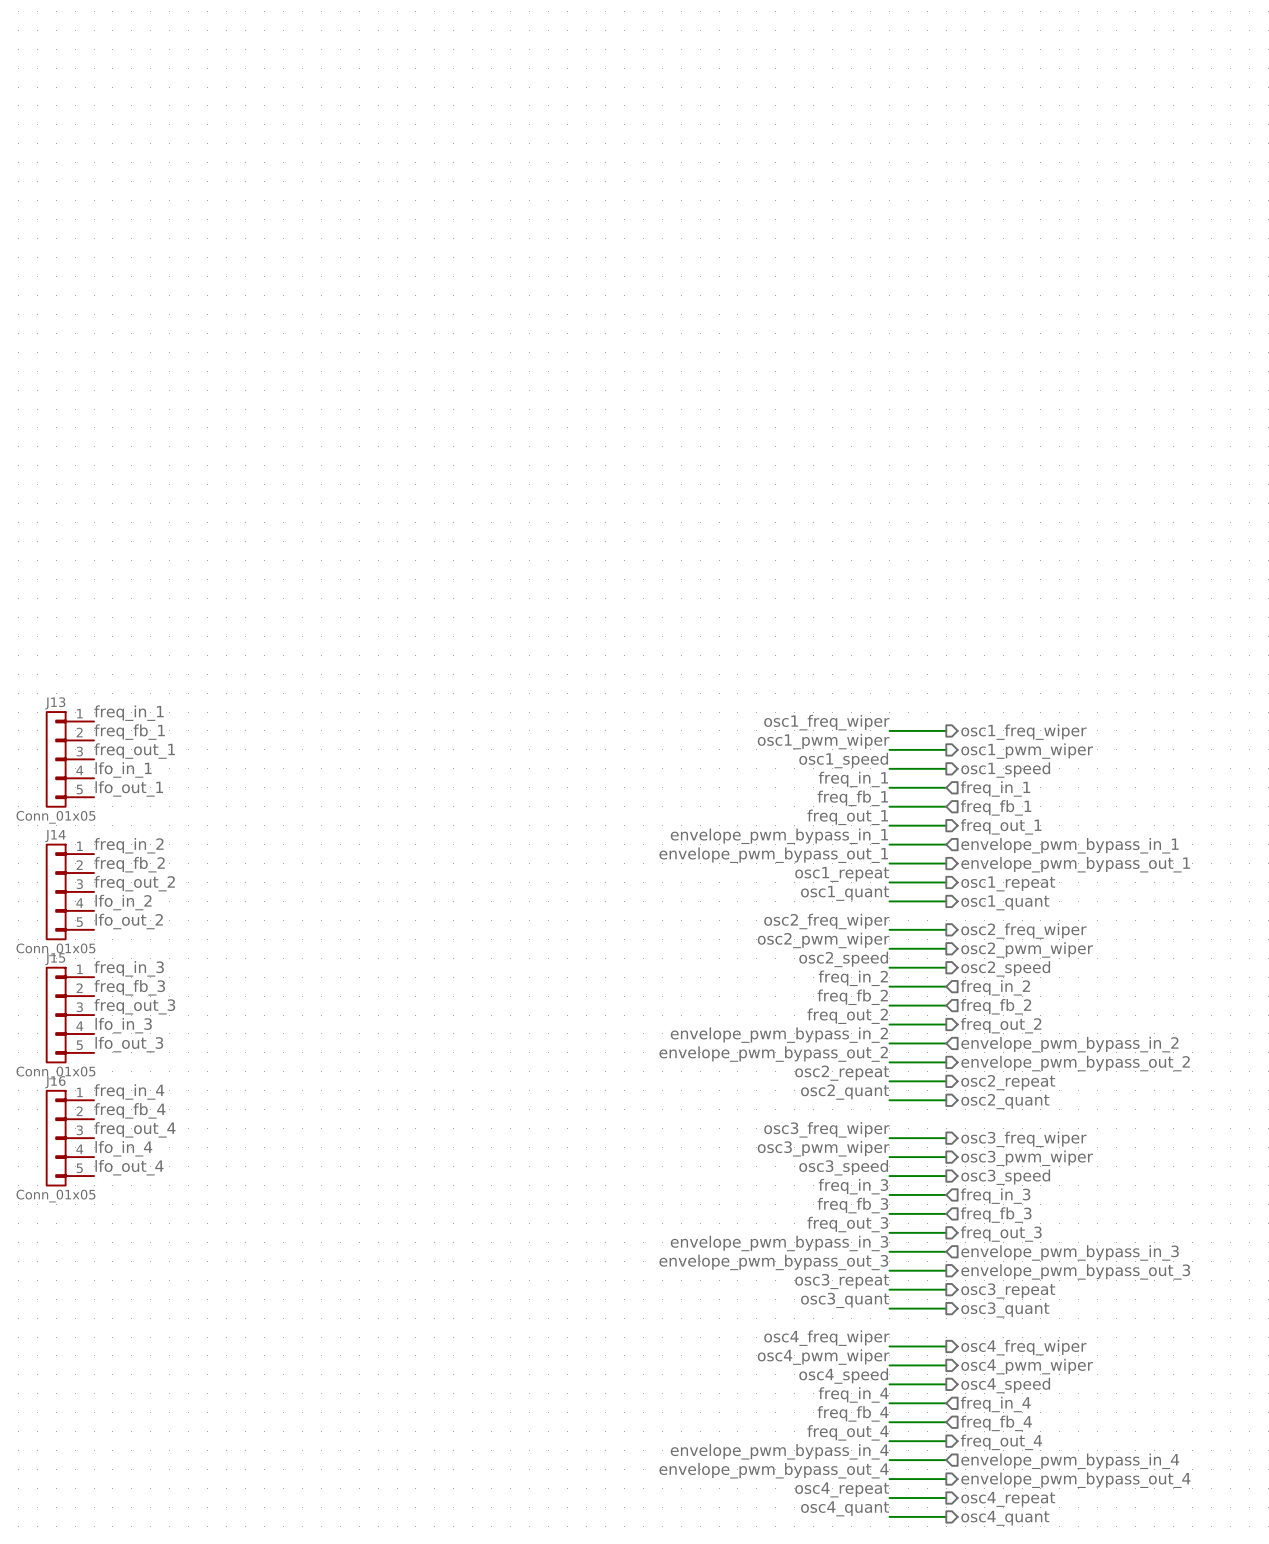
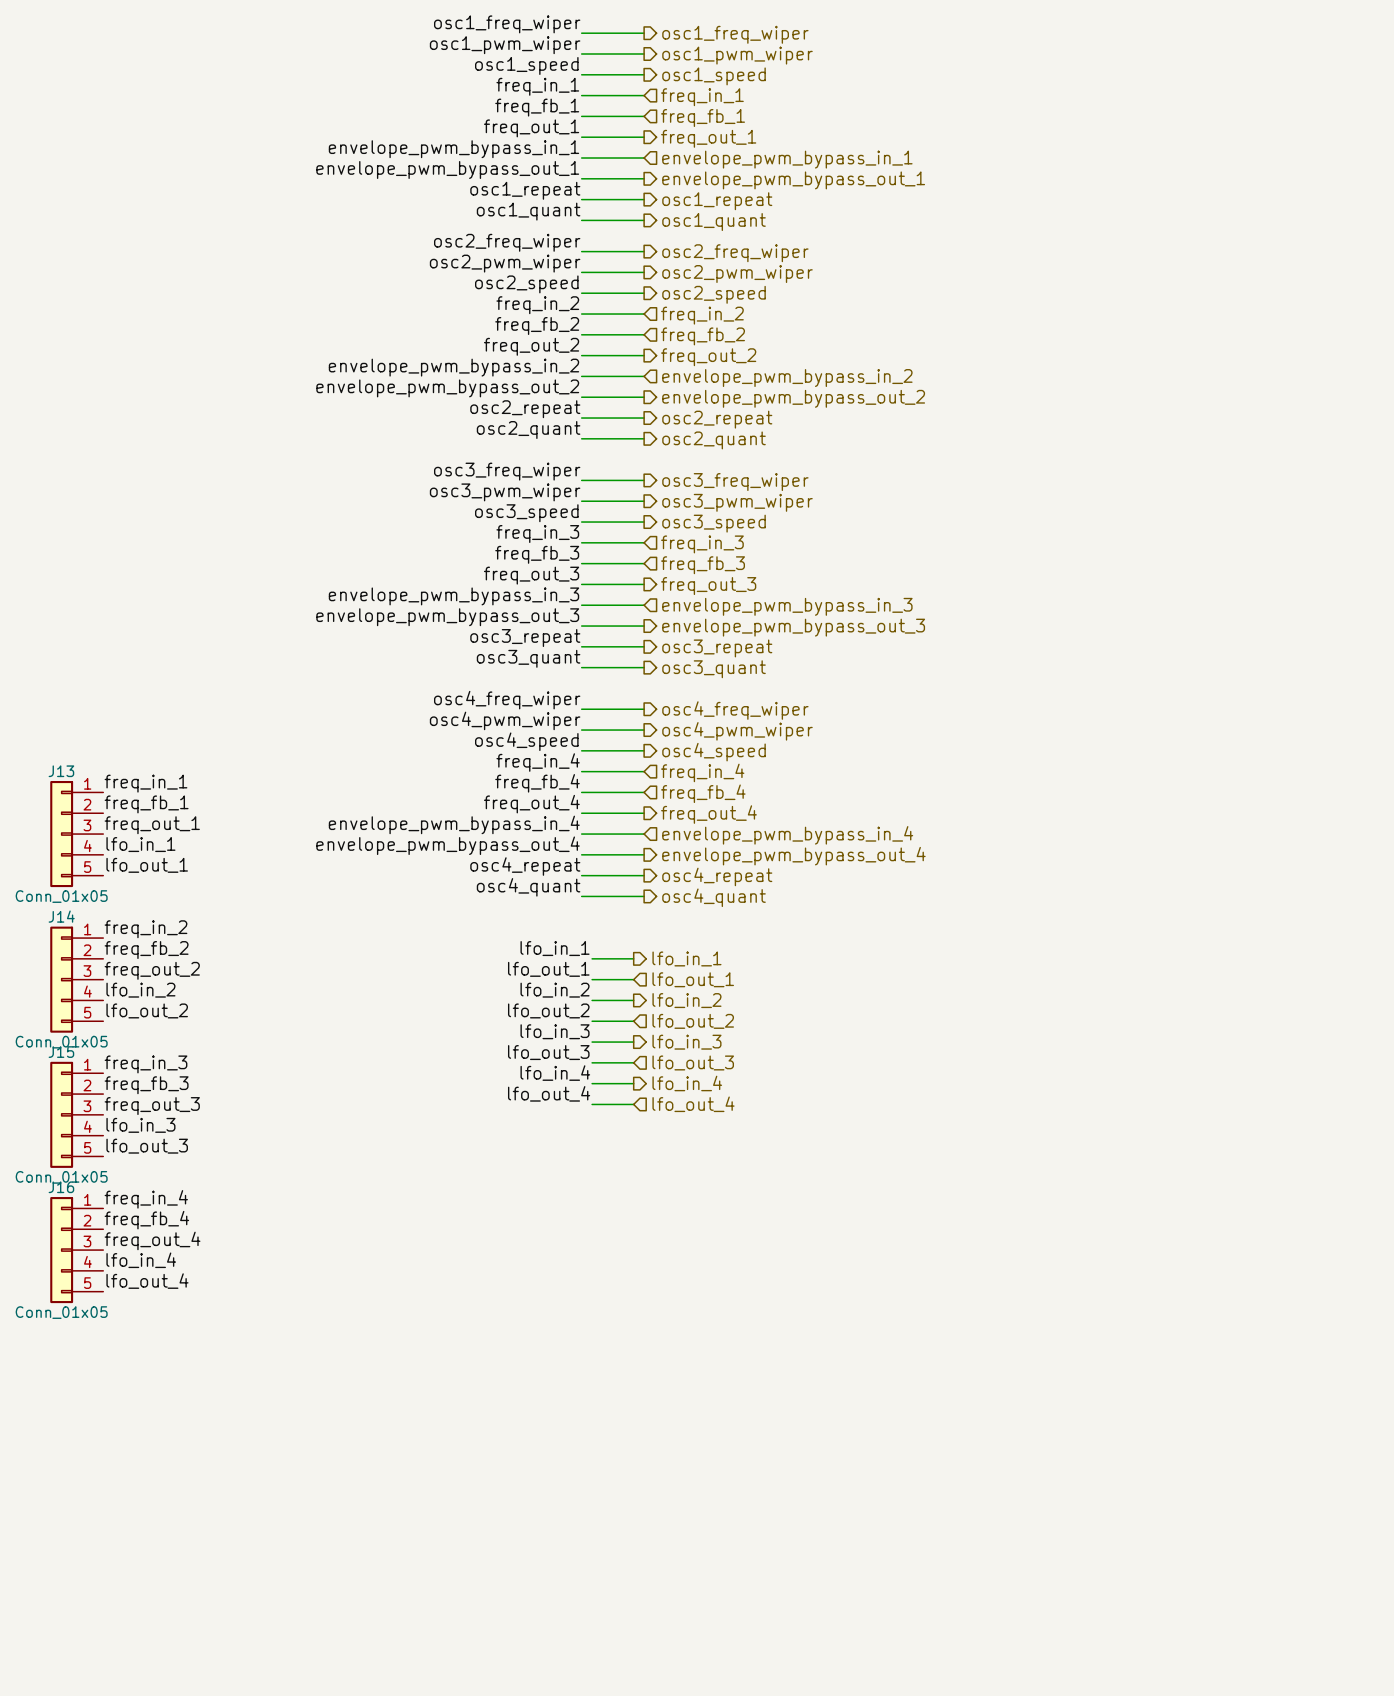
label: none -> osc1_freq_wiper (507, 24)
wire: none -> (581, 33) (644, 33)
hierarchical label: none -> osc1_freq_wiper (735, 34)
label: none -> osc1_pwm_wiper (505, 45)
wire: none -> (581, 53) (644, 53)
hierarchical label: none -> osc1_pwm_wiper (737, 55)
label: none -> osc1_speed (526, 65)
wire: none -> (581, 74) (644, 74)
hierarchical label: none -> osc1_speed (714, 76)
label: none -> freq_in_1 (537, 86)
wire: none -> (581, 95) (644, 95)
hierarchical label: none -> freq_in_1 (702, 97)
label: none -> freq_fb_1 (537, 107)
wire: none -> (581, 116) (644, 116)
hierarchical label: none -> freq_fb_1 (703, 118)
label: none -> freq_out_1 (531, 128)
wire: none -> (581, 137) (644, 137)
hierarchical label: none -> freq_out_1 (708, 138)
label: none -> envelope_pwm_bypass_in_1 (453, 149)
wire: none -> (581, 158) (644, 158)
hierarchical label: none -> envelope_pwm_bypass_in_1 (787, 159)
label: none -> envelope_pwm_bypass_out_1 (447, 169)
wire: none -> (581, 178) (644, 178)
hierarchical label: none -> envelope_pwm_bypass_out_1 (793, 180)
label: none -> osc1_repeat (525, 190)
wire: none -> (581, 199) (644, 199)
hierarchical label: none -> osc1_repeat (717, 201)
label: none -> osc1_quant (528, 211)
wire: none -> (581, 220) (644, 220)
hierarchical label: none -> osc1_quant (714, 222)
label: none -> osc2_freq_wiper (507, 242)
wire: none -> (581, 251) (644, 251)
hierarchical label: none -> osc2_freq_wiper (735, 253)
label: none -> osc2_pwm_wiper (505, 263)
wire: none -> (581, 272) (644, 272)
hierarchical label: none -> osc2_pwm_wiper (737, 274)
label: none -> osc2_speed (526, 284)
wire: none -> (581, 293) (644, 293)
hierarchical label: none -> osc2_speed (714, 294)
label: none -> freq_in_2 (537, 305)
wire: none -> (581, 314) (644, 314)
hierarchical label: none -> freq_in_2 (702, 315)
label: none -> freq_fb_2 (537, 326)
wire: none -> (581, 334) (644, 334)
hierarchical label: none -> freq_fb_2 (703, 336)
label: none -> freq_out_2 (531, 346)
wire: none -> (581, 355) (644, 355)
hierarchical label: none -> freq_out_2 (708, 357)
label: none -> envelope_pwm_bypass_in_2 (453, 367)
wire: none -> (581, 376) (644, 376)
hierarchical label: none -> envelope_pwm_bypass_in_2 (787, 378)
label: none -> envelope_pwm_bypass_out_2 (447, 388)
wire: none -> (581, 397) (644, 397)
hierarchical label: none -> envelope_pwm_bypass_out_2 (793, 398)
label: none -> osc2_repeat (525, 409)
wire: none -> (581, 418) (644, 418)
hierarchical label: none -> osc2_repeat (717, 419)
label: none -> osc2_quant (528, 430)
wire: none -> (581, 438) (644, 438)
hierarchical label: none -> osc2_quant (714, 440)
label: none -> osc3_freq_wiper (507, 471)
wire: none -> (581, 480) (644, 480)
hierarchical label: none -> osc3_freq_wiper (735, 482)
label: none -> osc3_pwm_wiper (505, 492)
wire: none -> (581, 501) (644, 501)
hierarchical label: none -> osc3_pwm_wiper (737, 502)
label: none -> osc3_speed (526, 513)
wire: none -> (581, 522) (644, 522)
hierarchical label: none -> osc3_speed (714, 523)
label: none -> freq_in_3 (537, 534)
wire: none -> (581, 542) (644, 542)
hierarchical label: none -> freq_in_3 (702, 544)
label: none -> freq_fb_3 (537, 554)
wire: none -> (581, 563) (644, 563)
hierarchical label: none -> freq_fb_3 (703, 565)
label: none -> freq_out_3 (531, 575)
wire: none -> (581, 584) (644, 584)
hierarchical label: none -> freq_out_3 (708, 586)
label: none -> envelope_pwm_bypass_in_3 (453, 596)
wire: none -> (581, 605) (644, 605)
hierarchical label: none -> envelope_pwm_bypass_in_3 (787, 606)
label: none -> envelope_pwm_bypass_out_3 (447, 617)
wire: none -> (581, 626) (644, 626)
hierarchical label: none -> envelope_pwm_bypass_out_3 (793, 627)
label: none -> osc3_repeat (525, 638)
wire: none -> (581, 646) (644, 646)
hierarchical label: none -> osc3_repeat (717, 648)
label: none -> osc3_quant (528, 658)
wire: none -> (581, 667) (644, 667)
hierarchical label: none -> osc3_quant (714, 669)
label: none -> osc4_freq_wiper (507, 700)
wire: none -> (581, 709) (644, 709)
hierarchical label: none -> osc4_freq_wiper (735, 710)
label: none -> osc4_pwm_wiper (505, 720)
wire: none -> (581, 730) (644, 730)
hierarchical label: none -> osc4_pwm_wiper (737, 731)
label: none -> osc4_speed (526, 741)
wire: none -> (581, 750) (644, 750)
hierarchical label: none -> osc4_speed (714, 752)
label: none -> freq_in_4 (538, 762)
wire: none -> (581, 771) (644, 771)
hierarchical label: none -> freq_in_4 (702, 772)
label: none -> freq_fb_4 (537, 783)
wire: none -> (581, 792) (644, 792)
hierarchical label: none -> freq_fb_4 (703, 793)
label: osc1_freq_wiper (826, 722) -> none
wire: (889, 730) (946, 730) -> none
label: none -> freq_out_4 (531, 804)
hierarchical label: osc1_freq_wiper (1023, 732) -> none
wire: none -> (581, 813) (644, 813)
hierarchical label: none -> freq_out_4 (708, 814)
label: osc1_pwm_wiper (823, 741) -> none
wire: (889, 749) (946, 749) -> none
label: none -> envelope_pwm_bypass_in_4 (454, 824)
hierarchical label: osc1_pwm_wiper (1027, 751) -> none
wire: none -> (581, 834) (644, 834)
hierarchical label: none -> envelope_pwm_bypass_in_4 (787, 835)
label: osc1_speed (843, 760) -> none
wire: (889, 768) (946, 768) -> none
label: none -> envelope_pwm_bypass_out_4 (448, 845)
hierarchical label: osc1_speed (1005, 770) -> none
wire: none -> (581, 854) (644, 854)
hierarchical label: none -> envelope_pwm_bypass_out_4 (793, 856)
label: freq_in_1 (853, 779) -> none
wire: (889, 787) (946, 787) -> none
hierarchical label: freq_in_1 (995, 788) -> none
label: none -> osc4_repeat (525, 866)
wire: none -> (581, 875) (644, 875)
hierarchical label: none -> osc4_repeat (717, 876)
label: freq_fb_1 (852, 798) -> none
wire: (889, 806) (946, 806) -> none
hierarchical label: freq_fb_1 (996, 807) -> none
label: none -> osc4_quant (528, 887)
wire: none -> (581, 896) (644, 896)
hierarchical label: none -> osc4_quant (714, 897)
label: freq_out_1 (847, 817) -> none
wire: (889, 825) (946, 825) -> none
hierarchical label: freq_out_1 (1001, 826) -> none
label: envelope_pwm_bypass_in_1 (779, 836) -> none
wire: (889, 844) (946, 844) -> none
hierarchical label: envelope_pwm_bypass_in_1 (1069, 845) -> none
label: envelope_pwm_bypass_out_1 (773, 855) -> none
wire: (889, 863) (946, 863) -> none
label: none -> lfo_in_1 (555, 948)
hierarchical label: envelope_pwm_bypass_out_1 (1075, 864) -> none
wire: none -> (592, 958) (633, 958)
hierarchical label: none -> lfo_in_1 (686, 958)
label: osc1_repeat (842, 874) -> none
wire: (889, 882) (946, 882) -> none
label: none -> lfo_out_1 (548, 969)
hierarchical label: osc1_repeat (1008, 883) -> none
wire: none -> (592, 979) (633, 979)
hierarchical label: none -> lfo_out_1 (693, 979)
label: osc1_quant (845, 893) -> none
wire: (889, 901) (946, 901) -> none
label: none -> lfo_in_2 (555, 990)
hierarchical label: osc1_quant (1005, 902) -> none
wire: none -> (592, 1000) (633, 1000)
hierarchical label: none -> lfo_in_2 (686, 1000)
label: none -> lfo_out_2 (548, 1010)
label: osc2_freq_wiper (826, 921) -> none
wire: none -> (592, 1021) (633, 1021)
wire: (889, 929) (946, 929) -> none
hierarchical label: none -> lfo_out_2 (693, 1021)
hierarchical label: osc2_freq_wiper (1023, 931) -> none
label: none -> lfo_in_3 (555, 1031)
label: osc2_pwm_wiper (823, 940) -> none
wire: none -> (592, 1042) (633, 1042)
wire: (889, 948) (946, 948) -> none
hierarchical label: none -> lfo_in_3 (686, 1042)
hierarchical label: osc2_pwm_wiper (1027, 949) -> none
label: none -> lfo_out_3 (548, 1052)
label: osc2_speed (843, 959) -> none
wire: none -> (592, 1062) (633, 1062)
wire: (889, 967) (946, 967) -> none
hierarchical label: none -> lfo_out_3 (693, 1062)
hierarchical label: osc2_speed (1005, 968) -> none
label: none -> lfo_in_4 (555, 1073)
label: freq_in_2 (853, 978) -> none
wire: none -> (592, 1083) (633, 1083)
wire: (889, 986) (946, 986) -> none
hierarchical label: none -> lfo_in_4 (687, 1083)
hierarchical label: freq_in_2 (995, 987) -> none
label: none -> lfo_out_4 (549, 1093)
label: freq_fb_2 (852, 997) -> none
wire: none -> (592, 1104) (633, 1104)
wire: (889, 1005) (946, 1005) -> none
hierarchical label: none -> lfo_out_4 (693, 1104)
hierarchical label: freq_fb_2 (996, 1006) -> none
label: freq_out_2 (847, 1016) -> none
wire: (889, 1024) (946, 1024) -> none
hierarchical label: freq_out_2 (1001, 1025) -> none
label: envelope_pwm_bypass_in_2 (779, 1035) -> none
wire: (889, 1043) (946, 1043) -> none
hierarchical label: envelope_pwm_bypass_in_2 (1069, 1044) -> none
label: envelope_pwm_bypass_out_2 (773, 1054) -> none
wire: (889, 1062) (946, 1062) -> none
hierarchical label: envelope_pwm_bypass_out_2 (1075, 1063) -> none
label: osc2_repeat (842, 1073) -> none
wire: (889, 1081) (946, 1081) -> none
hierarchical label: osc2_repeat (1008, 1082) -> none
label: osc2_quant (845, 1092) -> none
wire: (889, 1100) (946, 1100) -> none
hierarchical label: osc2_quant (1005, 1101) -> none
label: osc3_freq_wiper (826, 1129) -> none
wire: (889, 1138) (946, 1138) -> none
hierarchical label: osc3_freq_wiper (1023, 1139) -> none
label: osc3_pwm_wiper (823, 1148) -> none
wire: (889, 1157) (946, 1157) -> none
hierarchical label: osc3_pwm_wiper (1027, 1158) -> none
label: osc3_speed (843, 1167) -> none
wire: (889, 1176) (946, 1176) -> none
hierarchical label: osc3_speed (1005, 1177) -> none
label: freq_in_3 (853, 1186) -> none
wire: (889, 1194) (946, 1194) -> none
hierarchical label: freq_in_3 (995, 1196) -> none
label: freq_fb_3 (852, 1205) -> none
wire: (889, 1213) (946, 1213) -> none
hierarchical label: freq_fb_3 (996, 1215) -> none
label: freq_out_3 (847, 1224) -> none
wire: (889, 1232) (946, 1232) -> none
hierarchical label: freq_out_3 (1001, 1234) -> none
label: envelope_pwm_bypass_in_3 (779, 1243) -> none
wire: (889, 1251) (946, 1251) -> none
hierarchical label: envelope_pwm_bypass_in_3 (1070, 1252) -> none
label: envelope_pwm_bypass_out_3 (773, 1262) -> none
wire: (889, 1270) (946, 1270) -> none
hierarchical label: envelope_pwm_bypass_out_3 (1075, 1271) -> none
label: osc3_repeat (842, 1281) -> none
wire: (889, 1289) (946, 1289) -> none
hierarchical label: osc3_repeat (1008, 1290) -> none
label: osc3_quant (845, 1300) -> none
wire: (889, 1308) (946, 1308) -> none
hierarchical label: osc3_quant (1005, 1309) -> none
label: osc4_freq_wiper (826, 1338) -> none
wire: (889, 1346) (946, 1346) -> none
hierarchical label: osc4_freq_wiper (1023, 1347) -> none
label: osc4_pwm_wiper (823, 1357) -> none
wire: (889, 1365) (946, 1365) -> none
hierarchical label: osc4_pwm_wiper (1027, 1366) -> none
label: osc4_speed (843, 1376) -> none
wire: (889, 1384) (946, 1384) -> none
hierarchical label: osc4_speed (1005, 1385) -> none
label: freq_in_4 (853, 1394) -> none
wire: (889, 1403) (946, 1403) -> none
hierarchical label: freq_in_4 (995, 1404) -> none
label: freq_fb_4 (853, 1413) -> none
wire: (889, 1422) (946, 1422) -> none
hierarchical label: freq_fb_4 (996, 1423) -> none
label: freq_out_4 (848, 1432) -> none
wire: (889, 1441) (946, 1441) -> none
hierarchical label: freq_out_4 (1001, 1442) -> none
label: envelope_pwm_bypass_in_4 (779, 1451) -> none
wire: (889, 1460) (946, 1460) -> none
hierarchical label: envelope_pwm_bypass_in_4 (1070, 1461) -> none
label: envelope_pwm_bypass_out_4 (774, 1470) -> none
wire: (889, 1479) (946, 1479) -> none
hierarchical label: envelope_pwm_bypass_out_4 (1075, 1480) -> none
label: osc4_repeat (842, 1489) -> none
wire: (889, 1498) (946, 1498) -> none
hierarchical label: osc4_repeat (1008, 1499) -> none
label: osc4_quant (845, 1508) -> none
wire: (889, 1516) (946, 1516) -> none
hierarchical label: osc4_quant (1005, 1518) -> none

